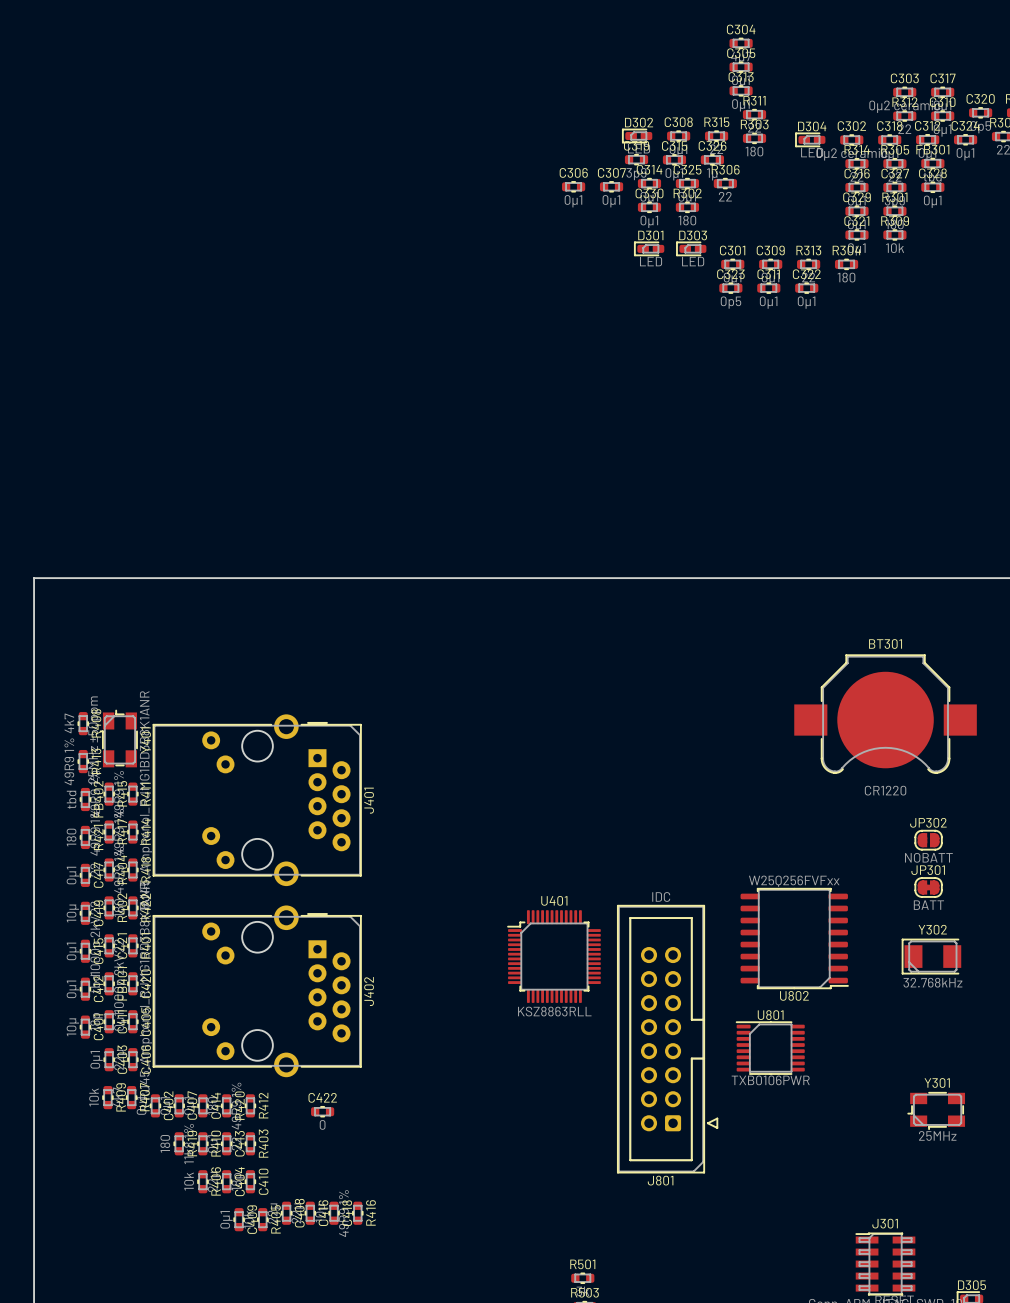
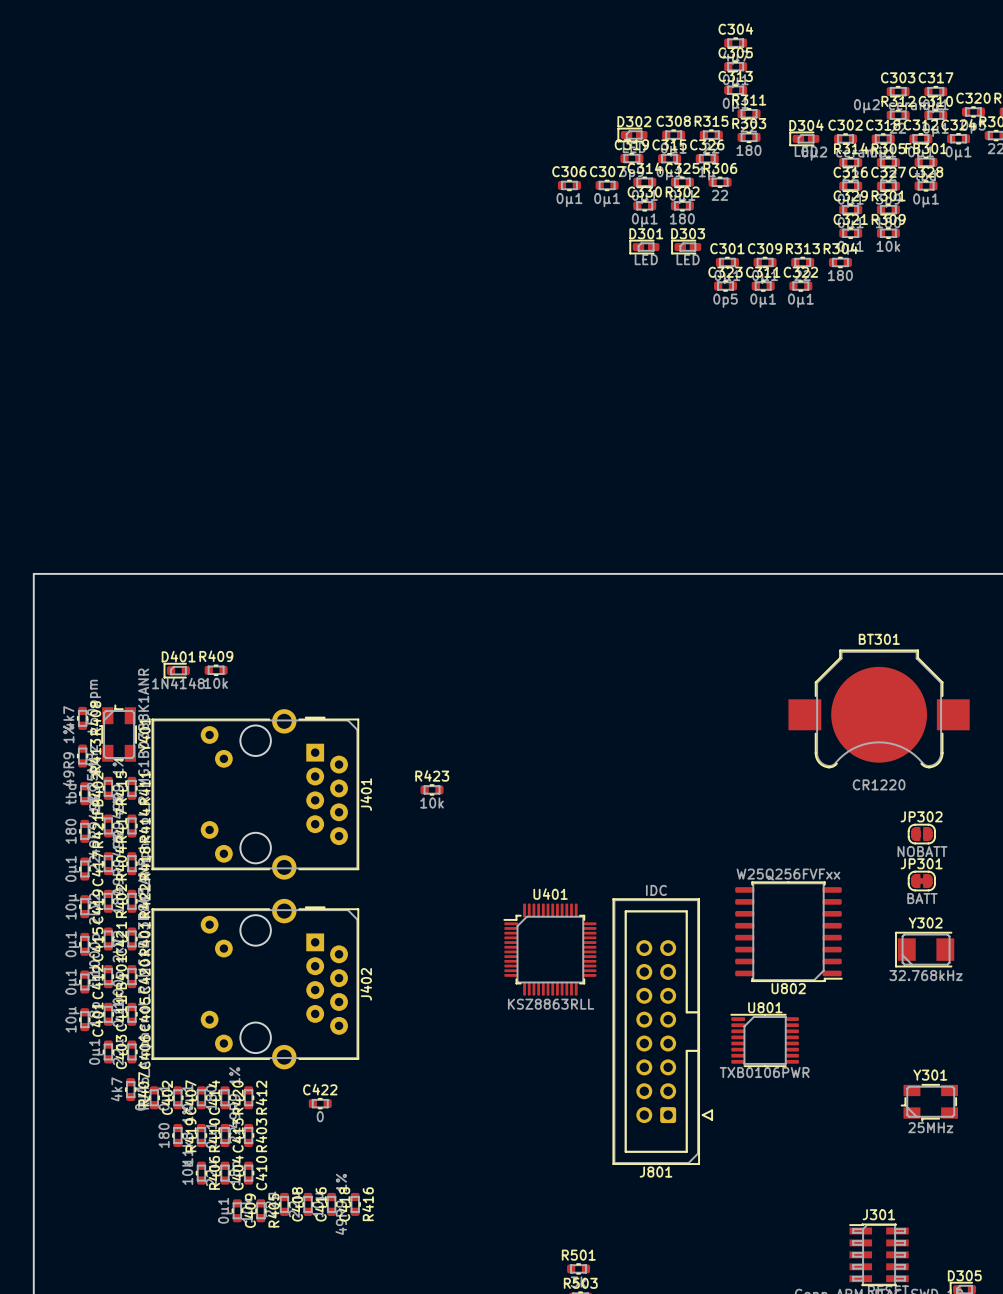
D401: none -> 1N4148 (176, 670)
R423: none -> 10k (432, 789)
R409 value position: 10k (94, 1097) -> 10k (216, 683)
R409 rotation: 0° (107, 1097) -> 90° clockwise (216, 670)
R409 position: (107, 1097) -> (216, 670)
R409 name position: R409 (121, 1097) -> R409 (216, 656)

